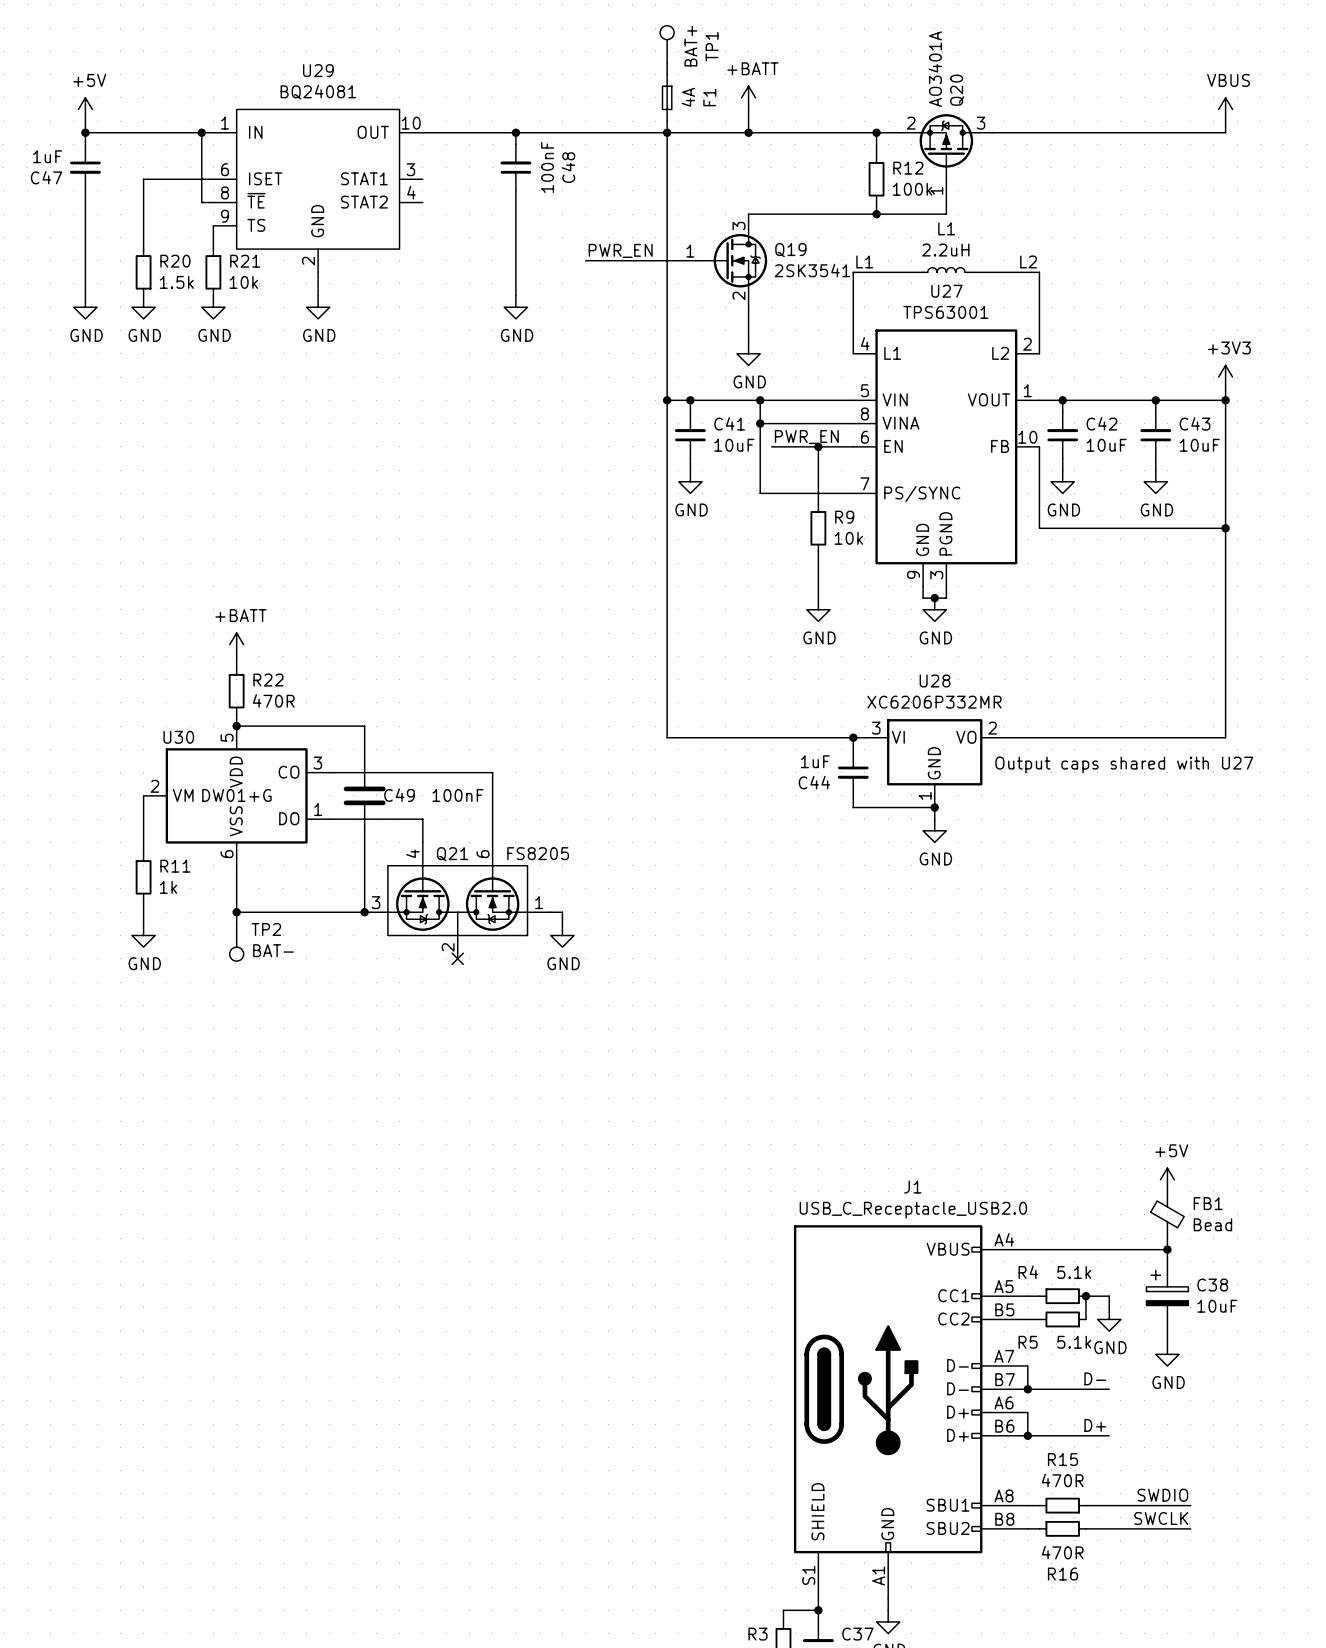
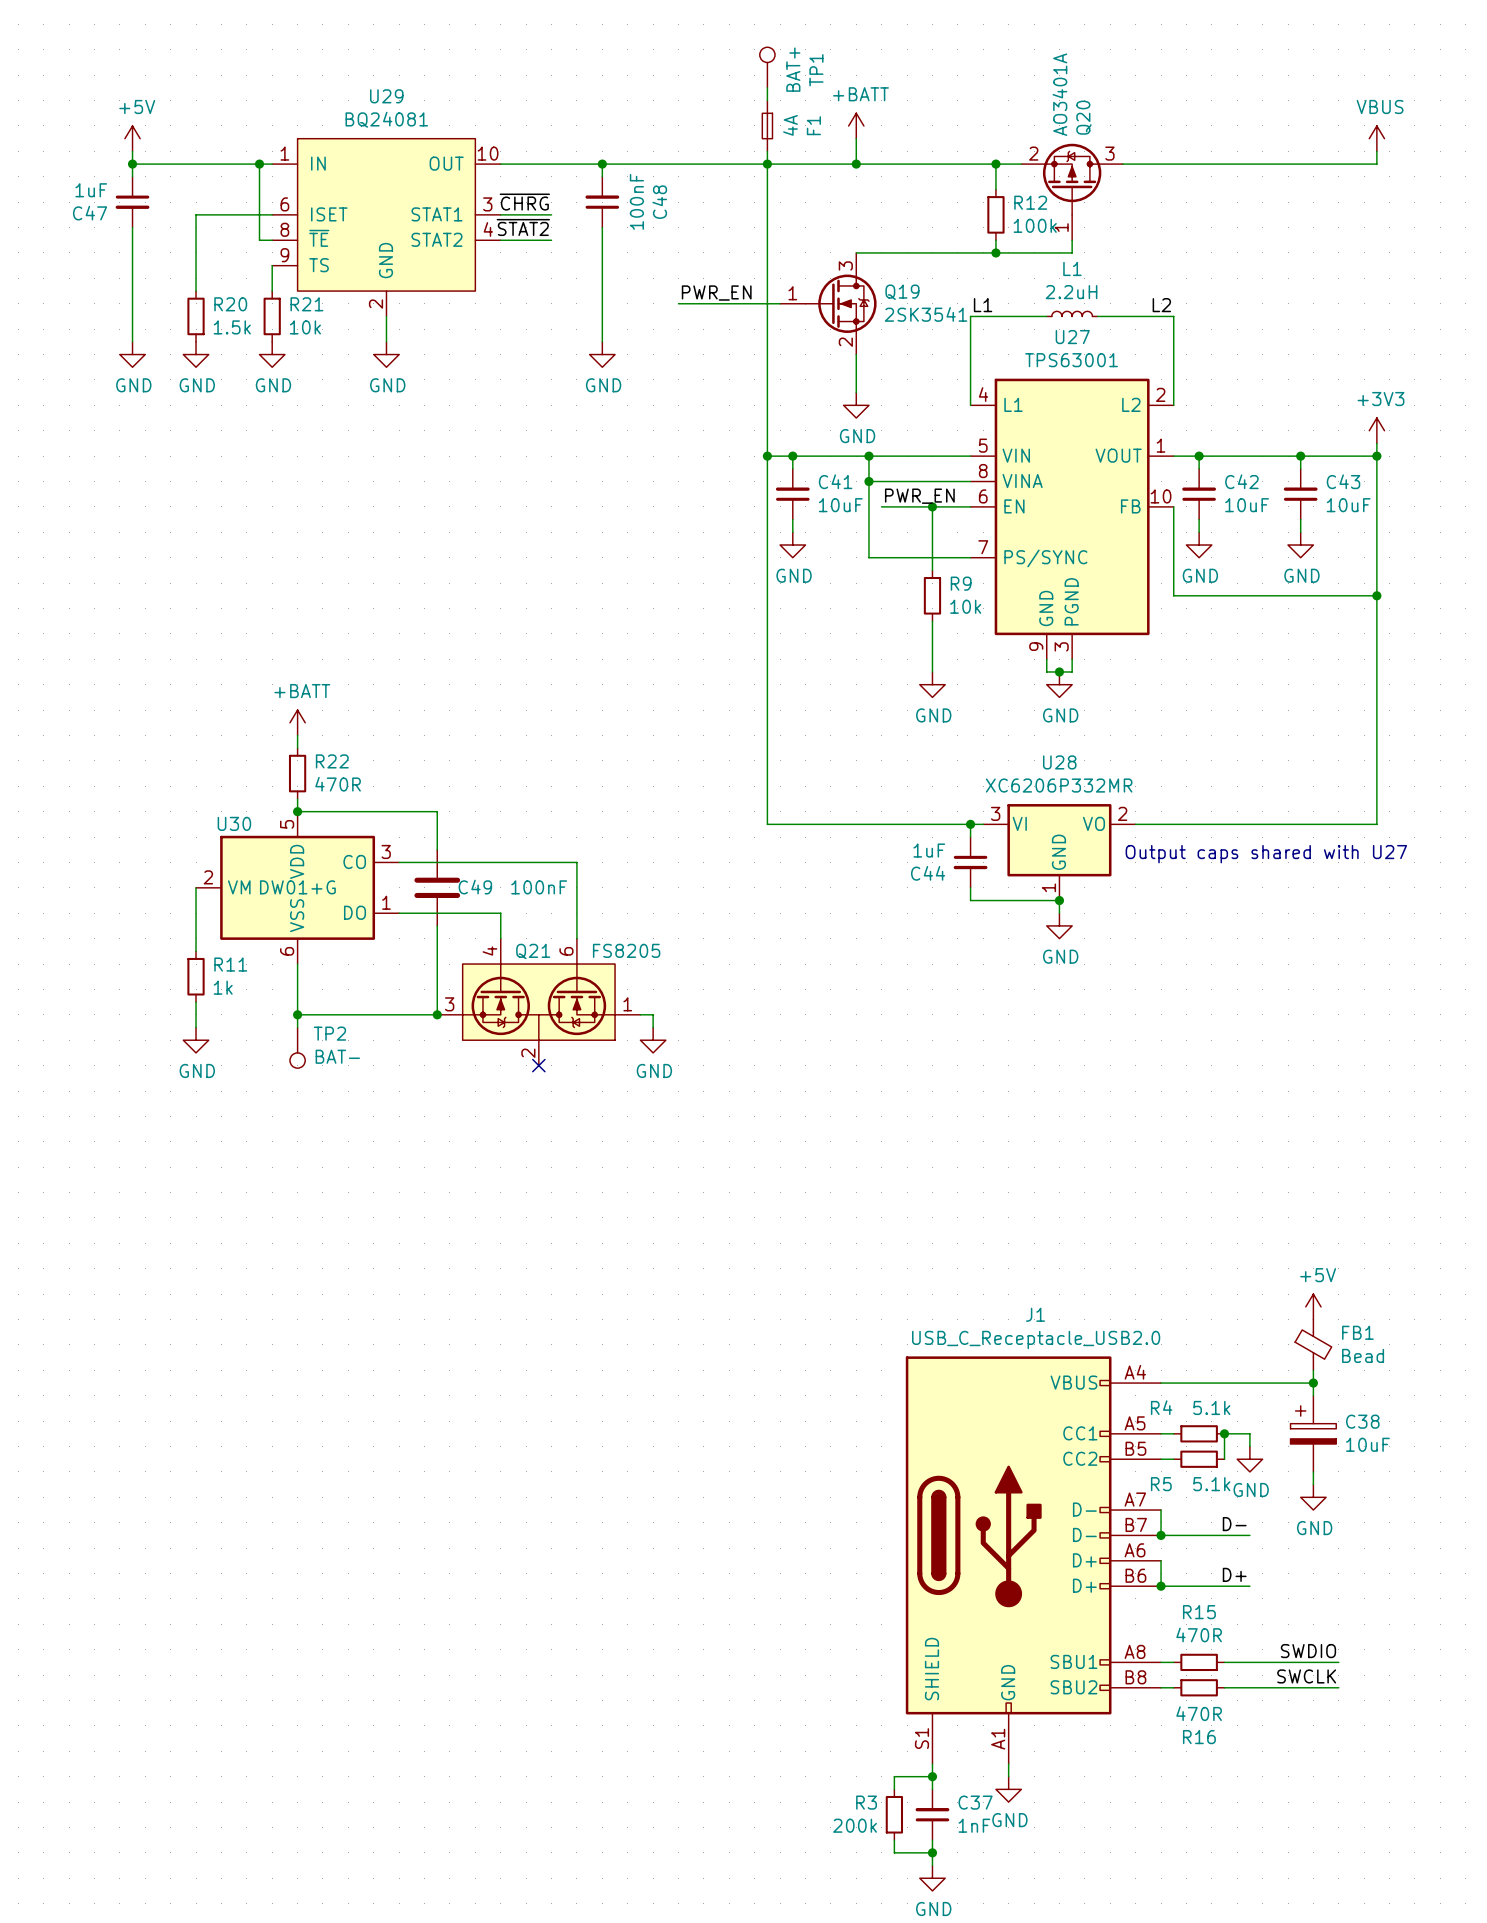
label: none -> ~{CHRG} (524, 202)
wire: none -> (500, 214) (551, 214)
label: none -> ~{STAT2} (523, 227)
wire: none -> (500, 240) (551, 240)

